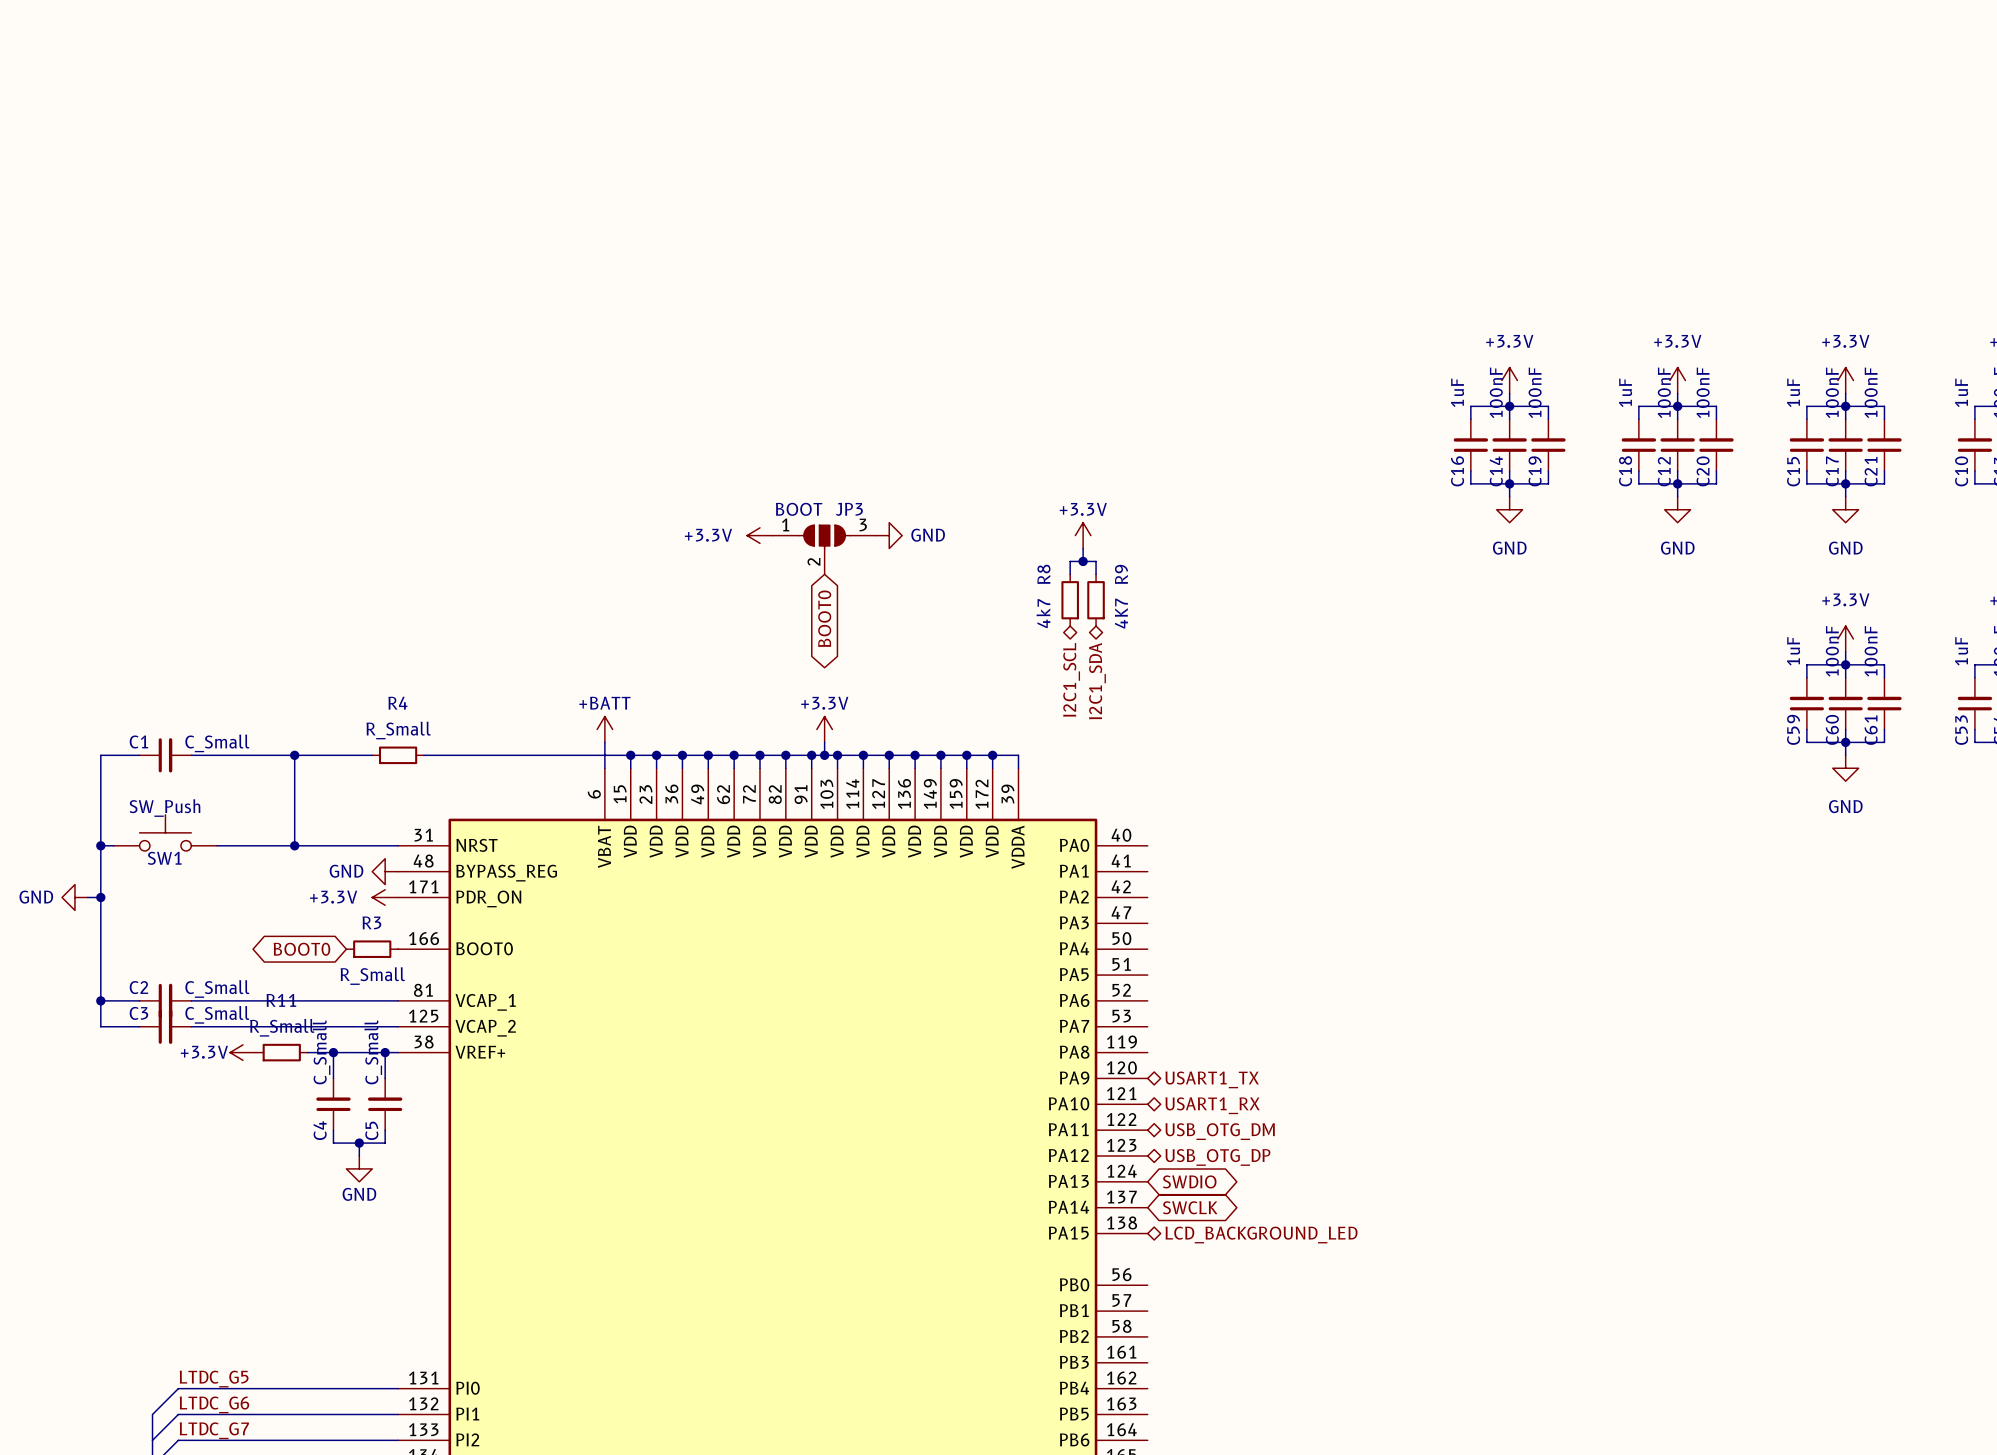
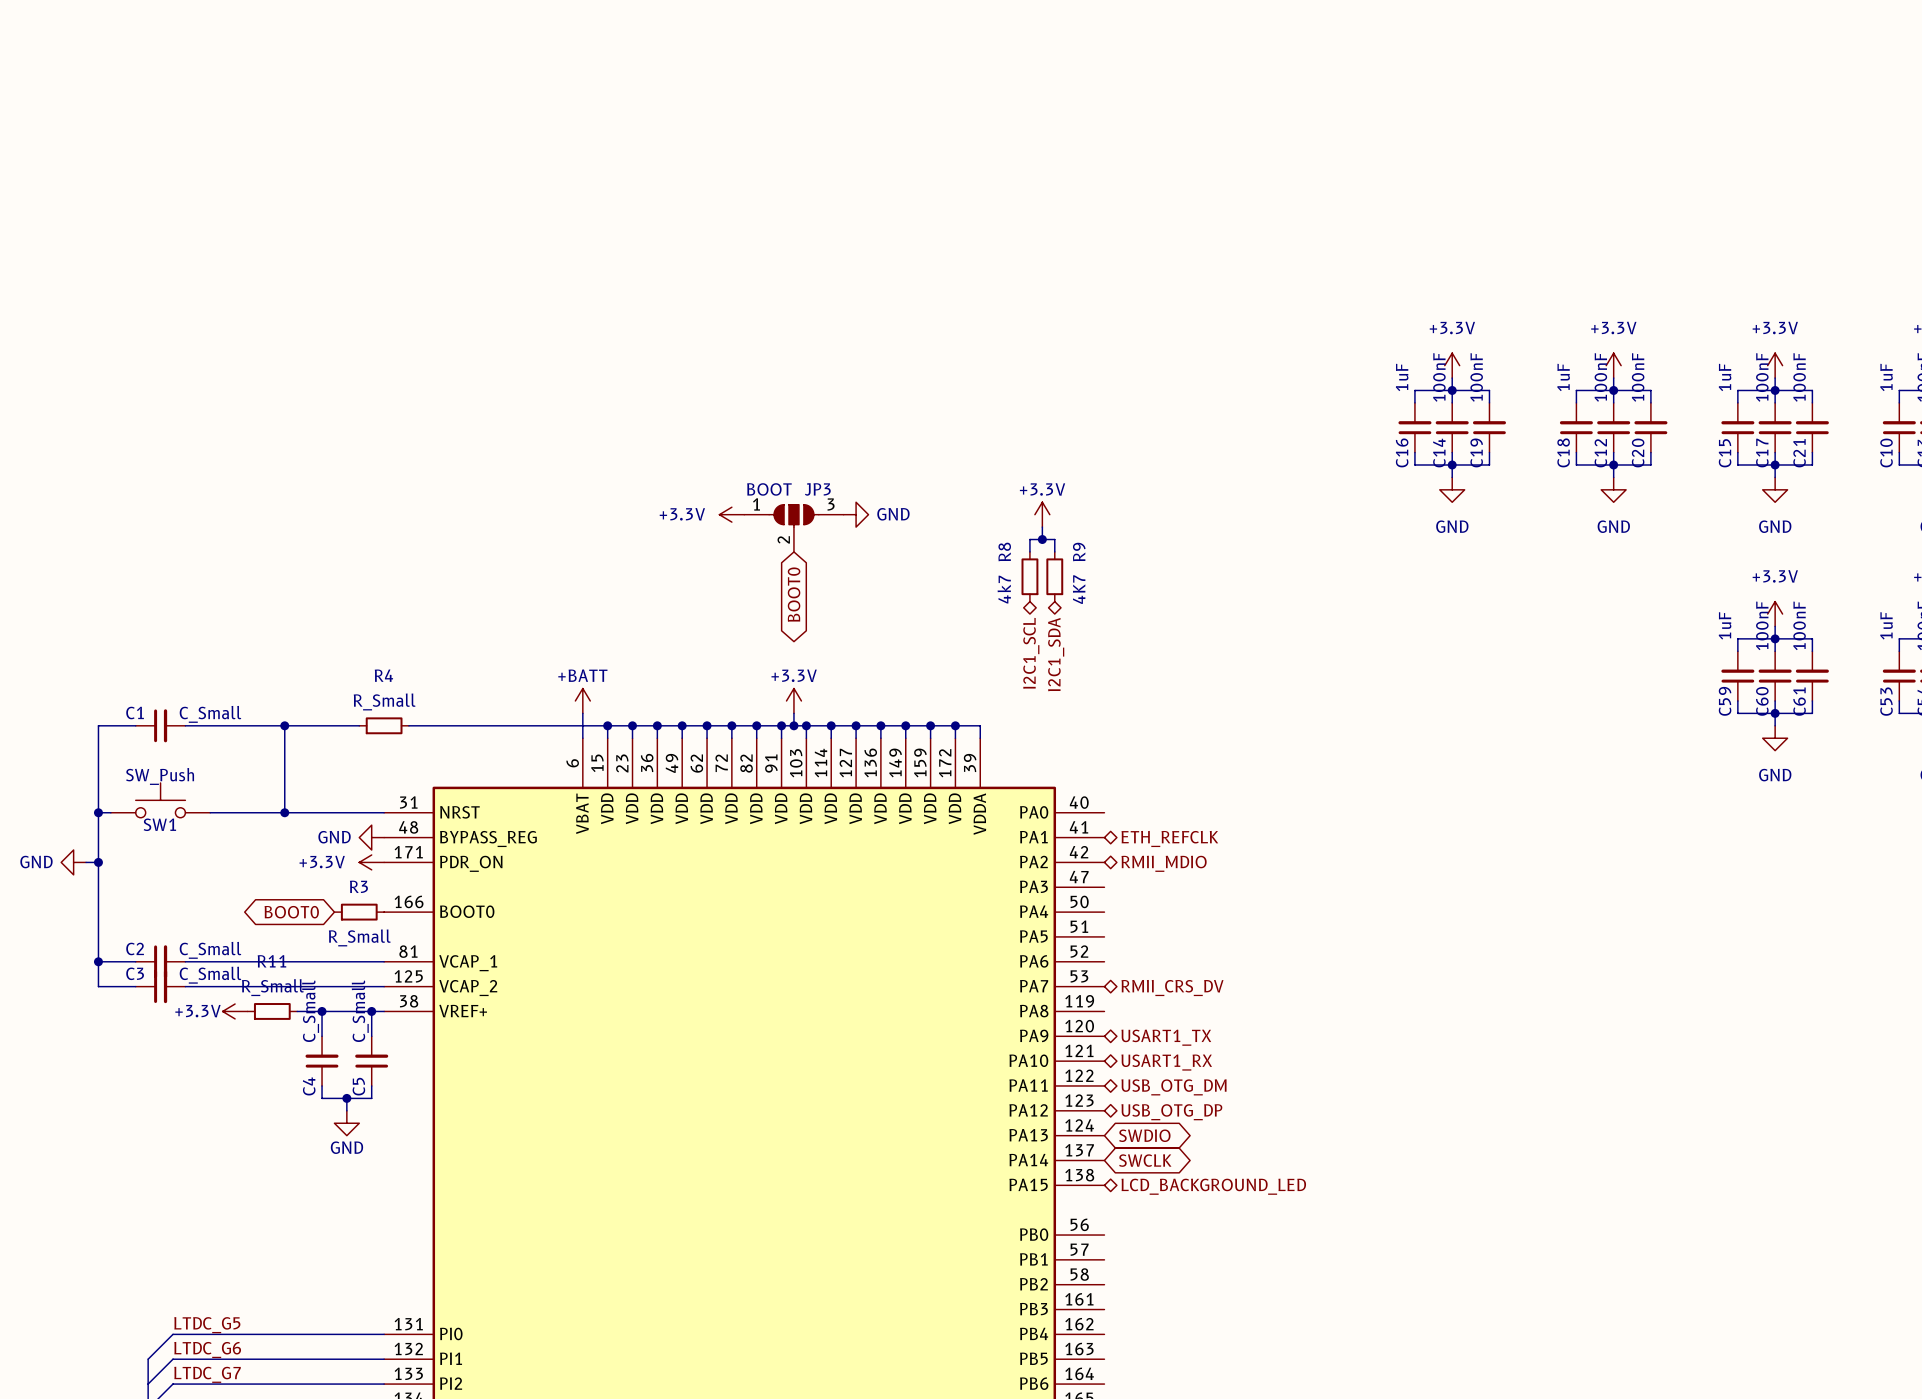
hierarchical label: none -> ETH_REFCLK (1169, 838)
hierarchical label: none -> RMII_MDIO (1164, 863)
hierarchical label: none -> RMII_CRS_DV (1172, 988)

